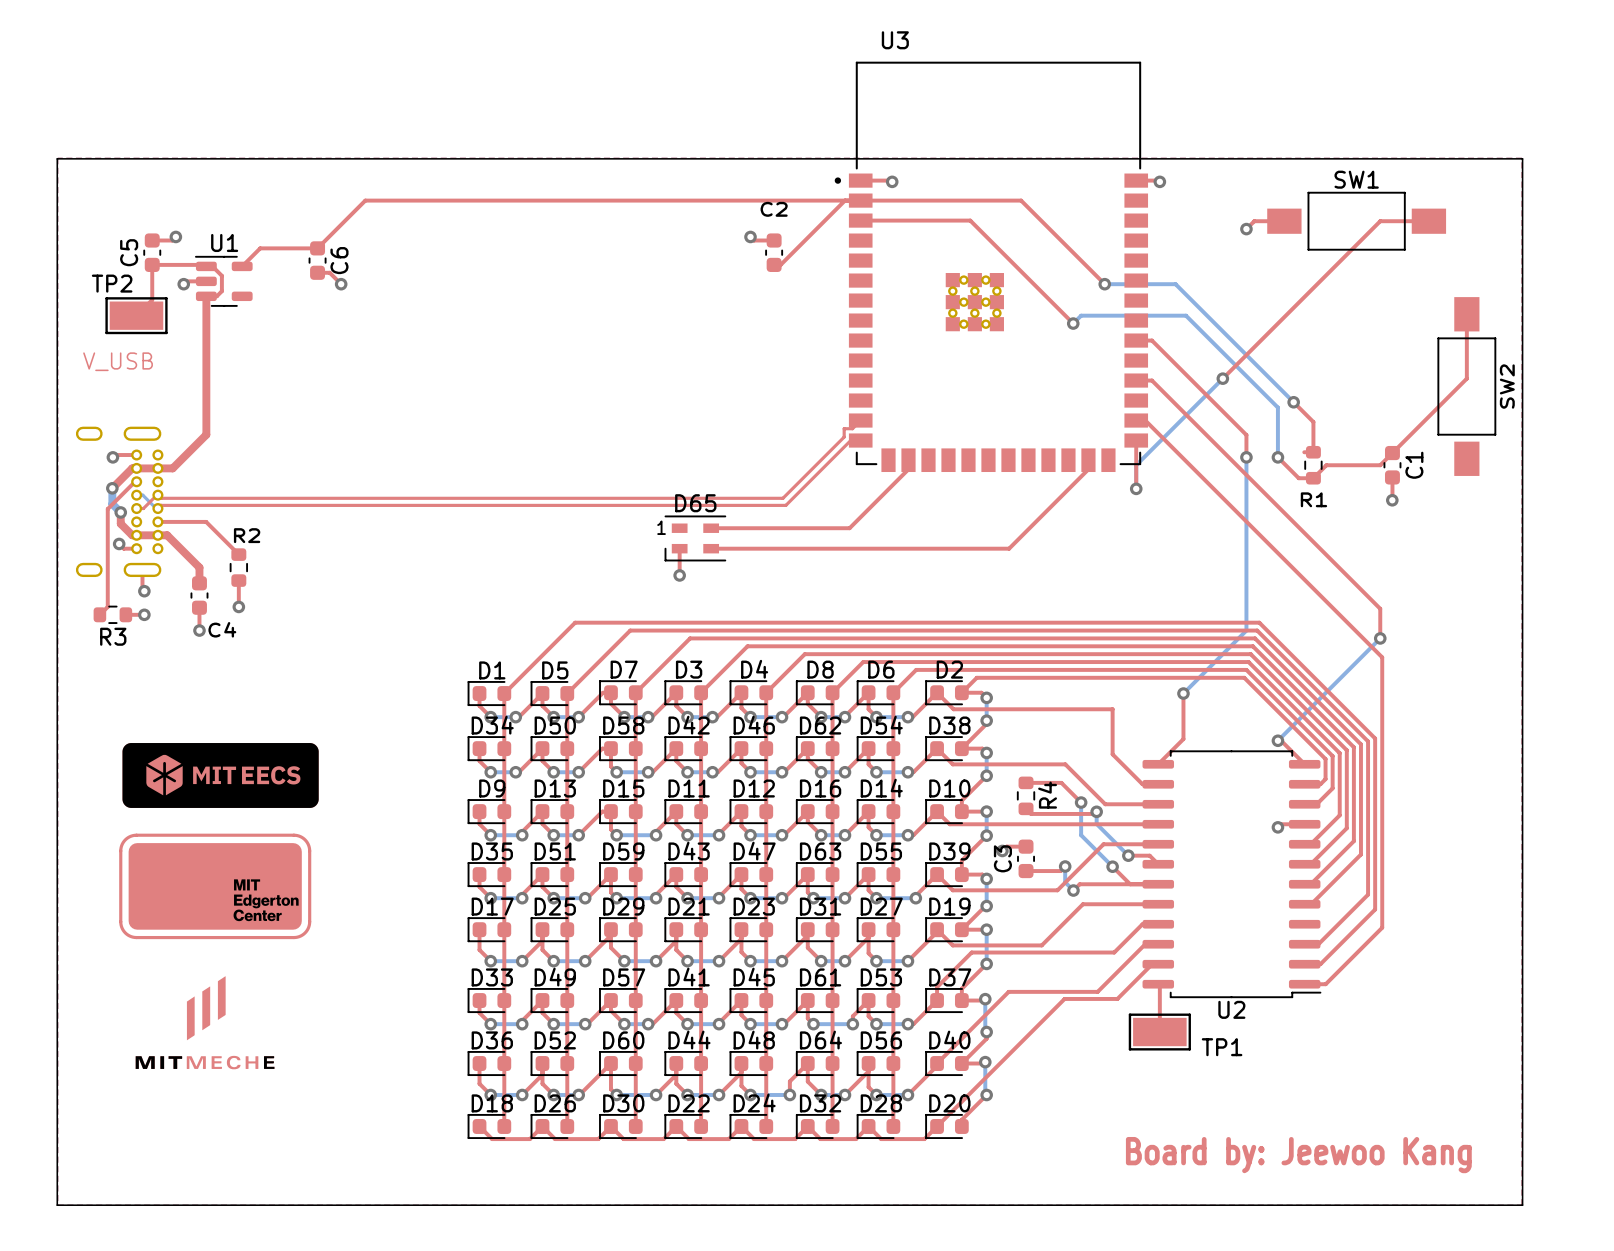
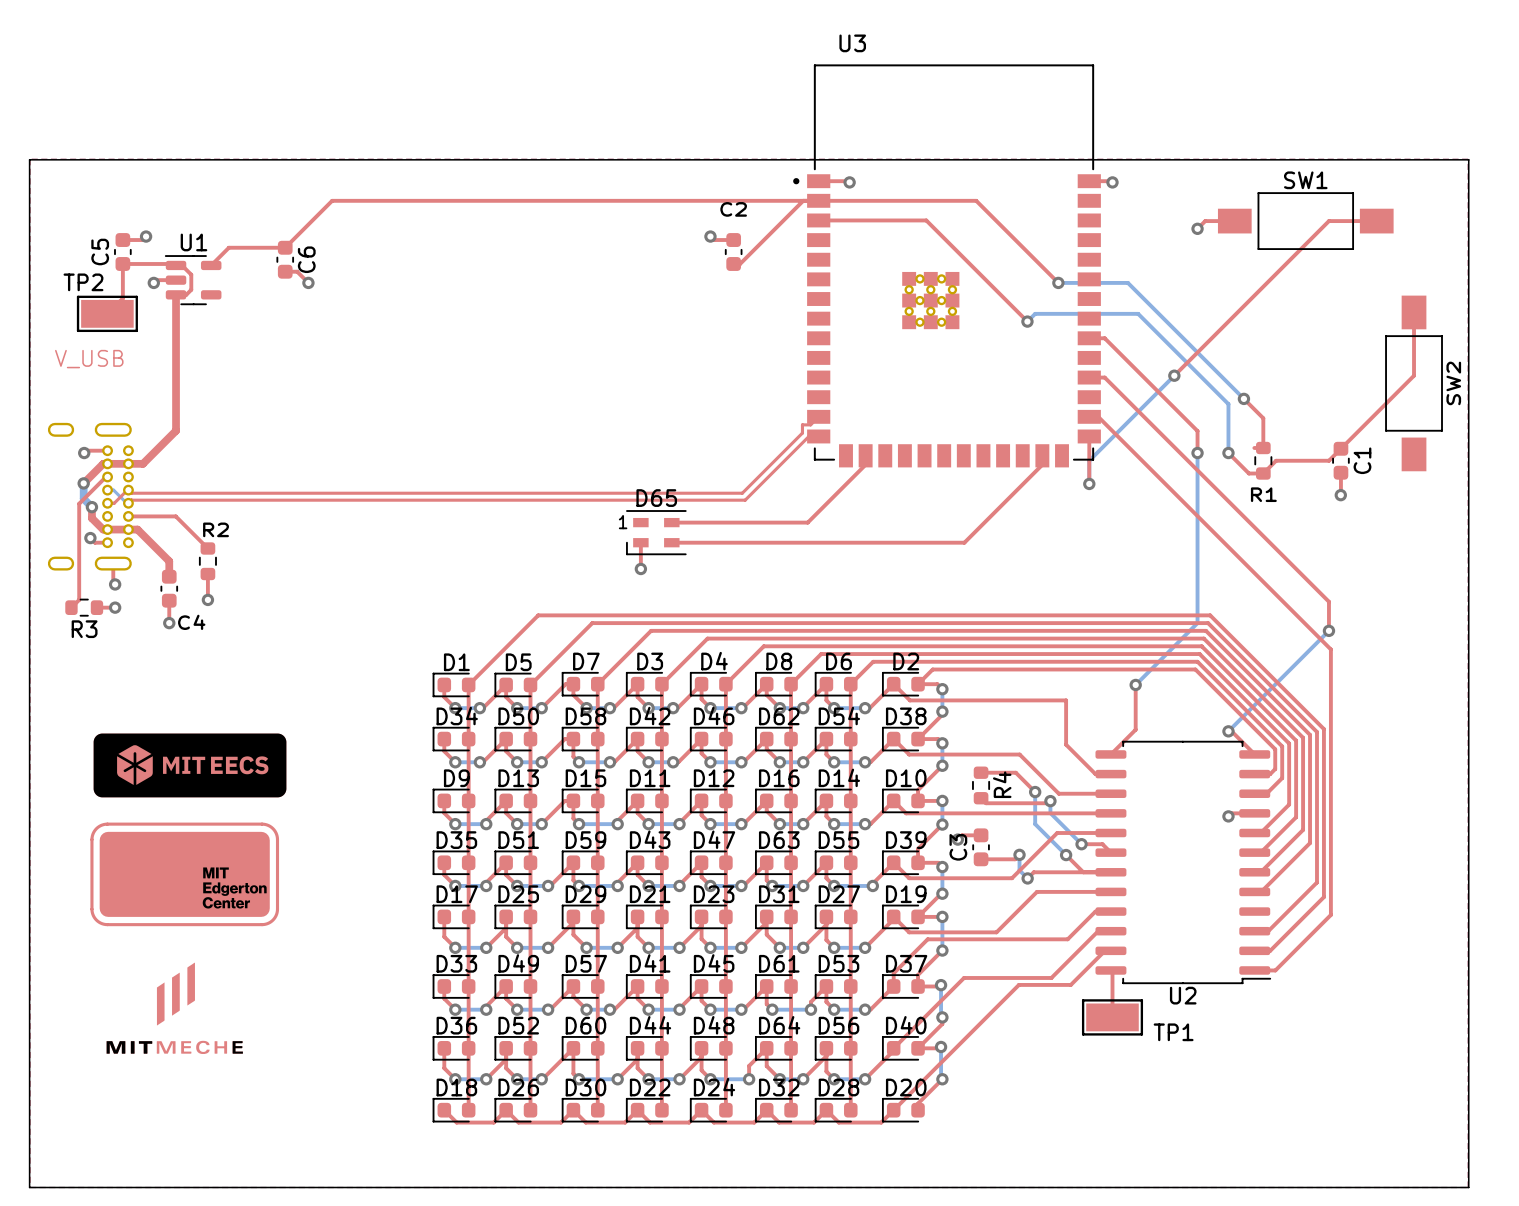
text: Board by: Jeewoo Kang (1298, 1155) -> none

